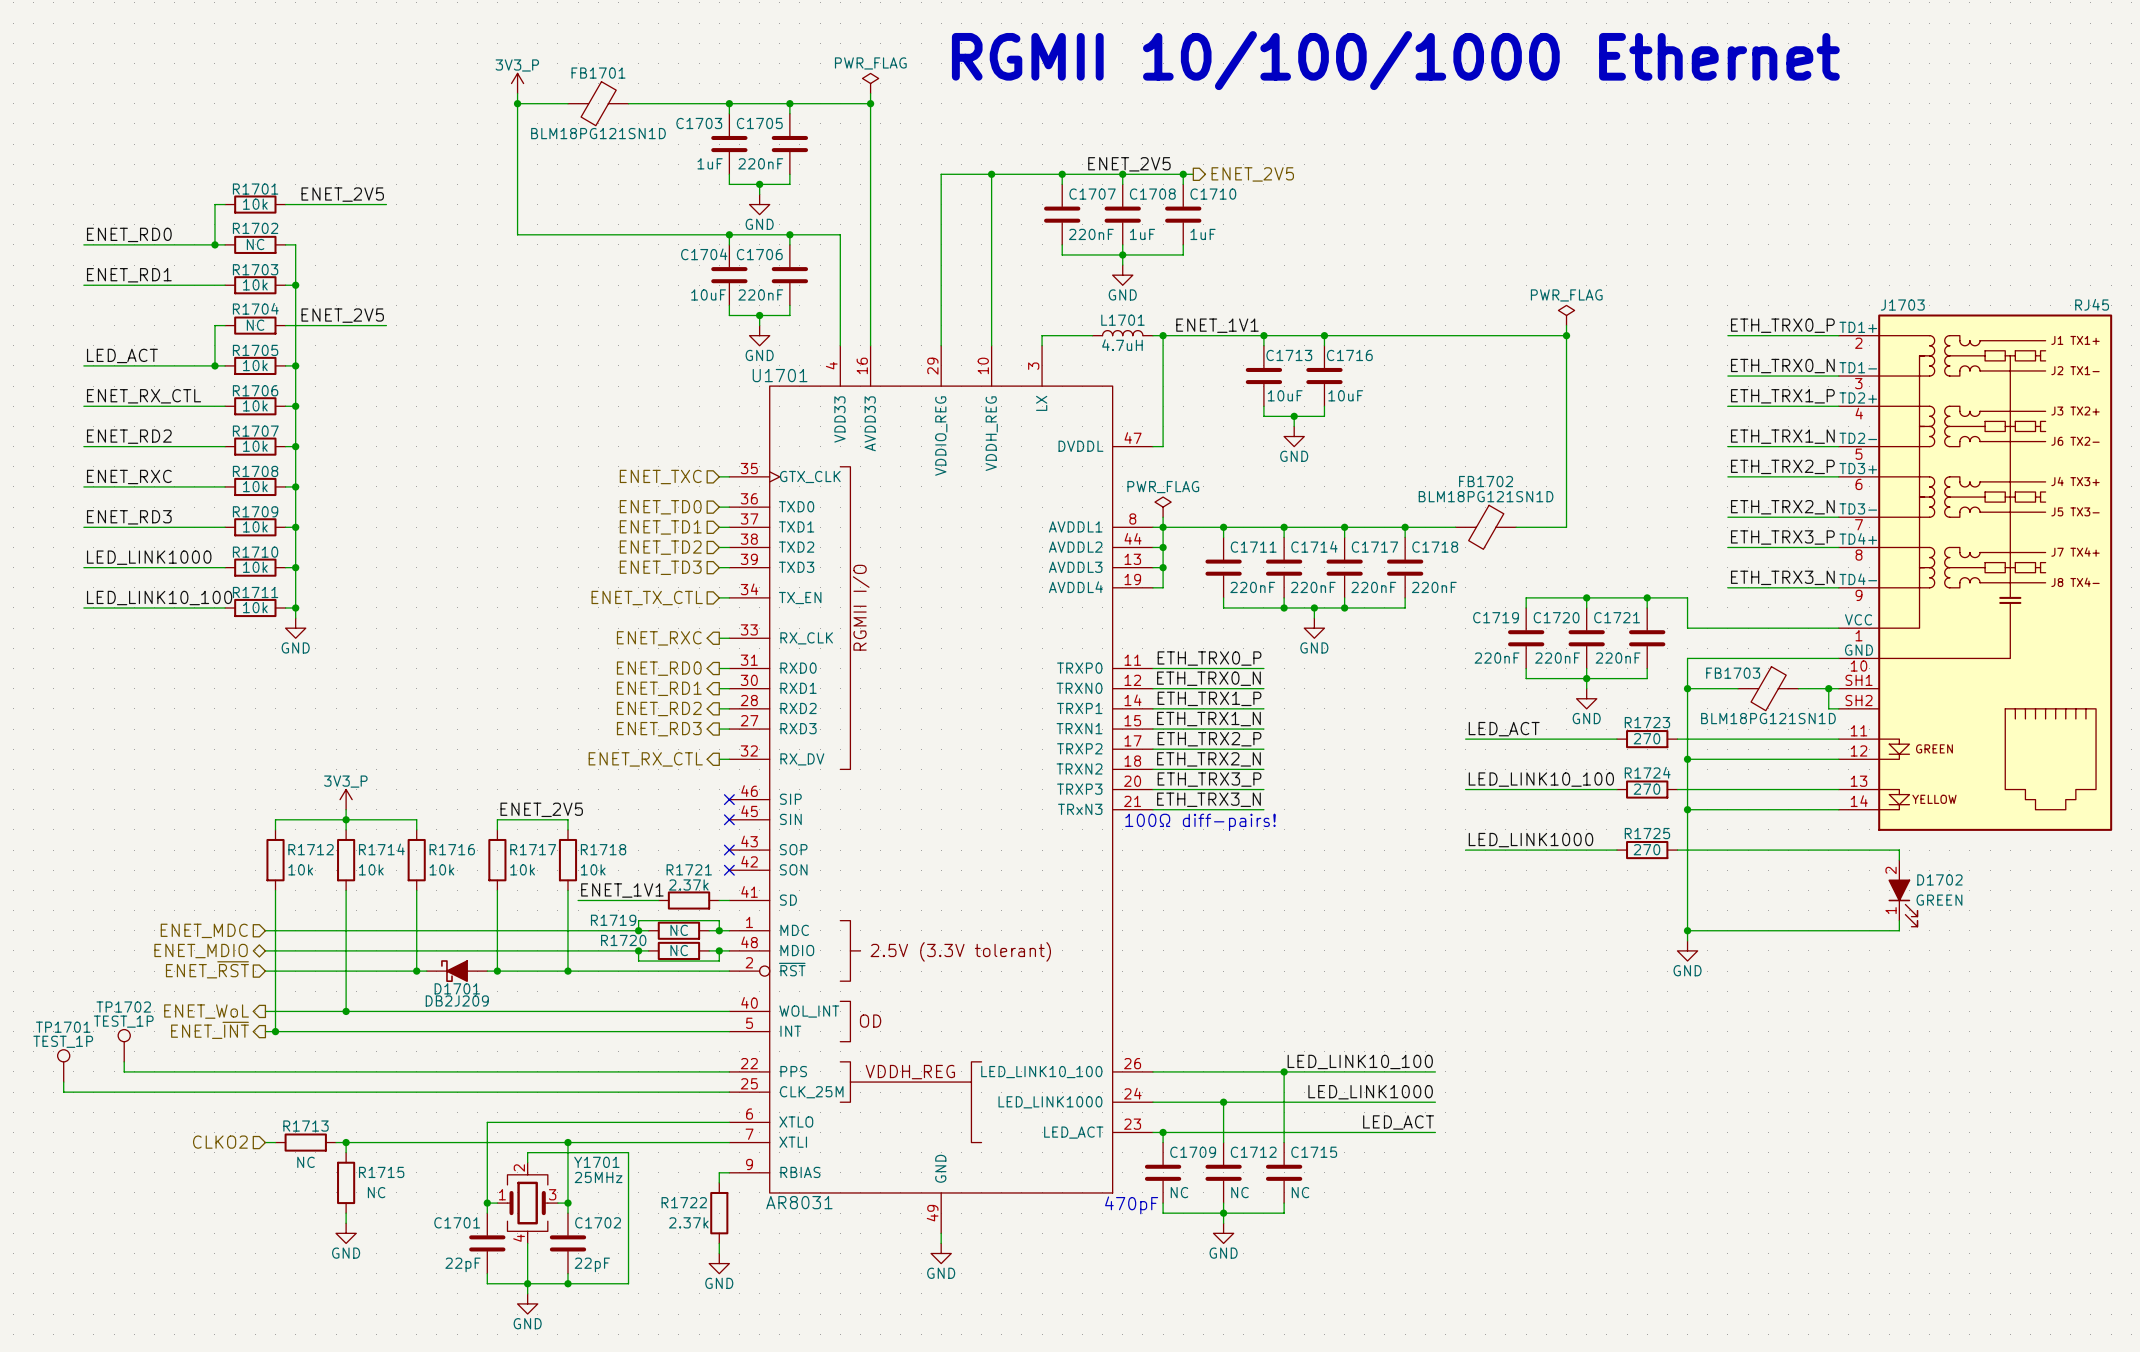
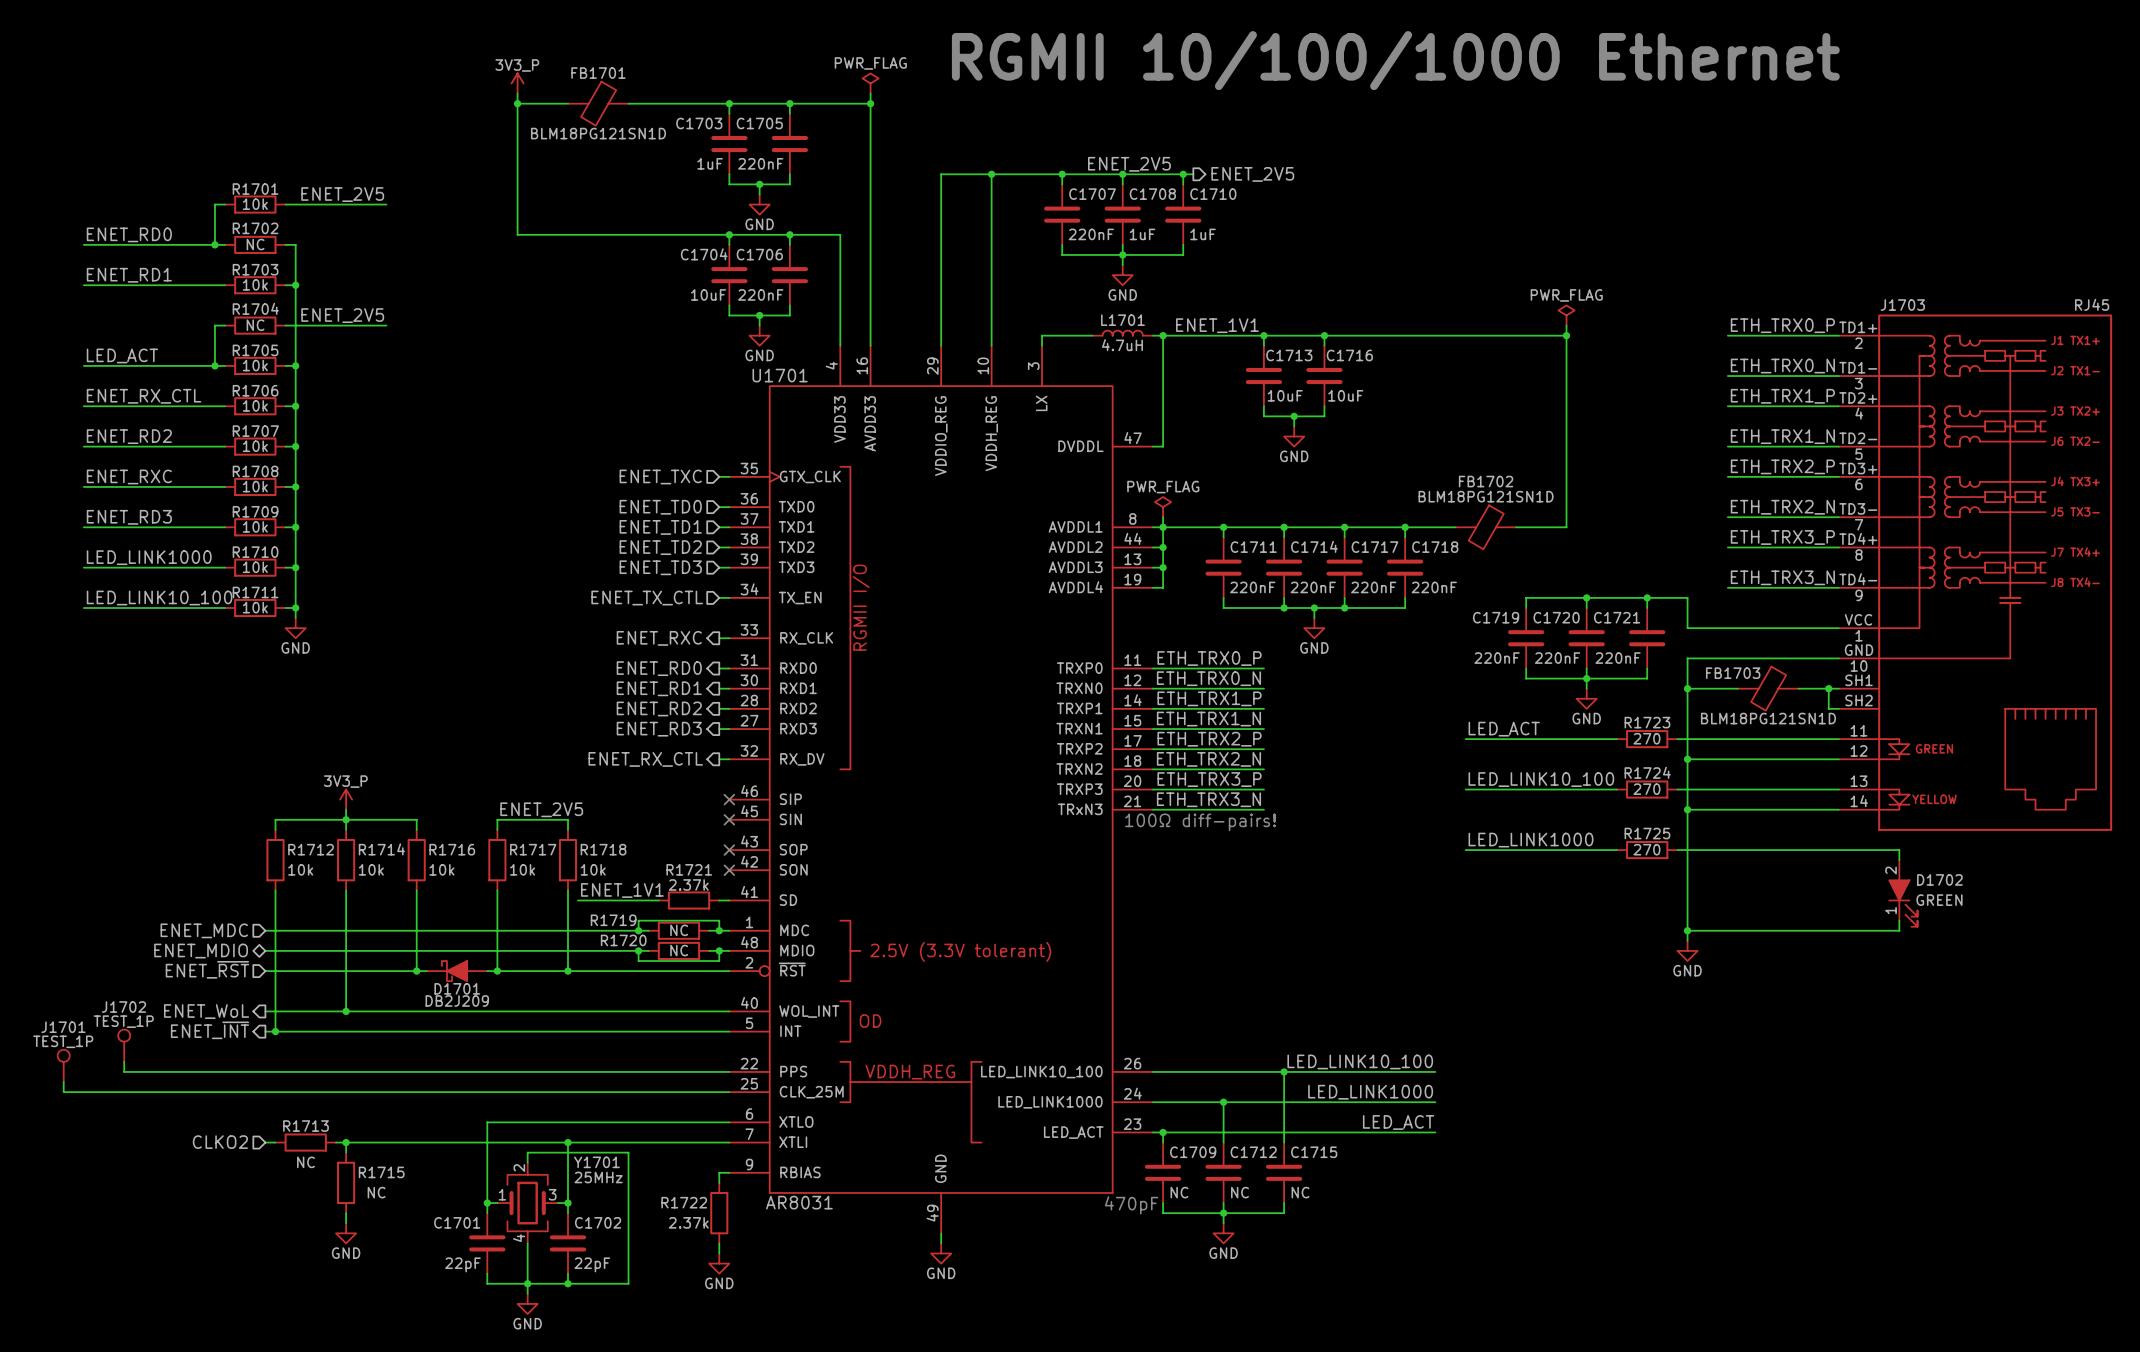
TP1702 name: TP1702 (123, 1007) -> J1702 (123, 1007)
TP1701 name: TP1701 (63, 1027) -> J1701 (63, 1027)

